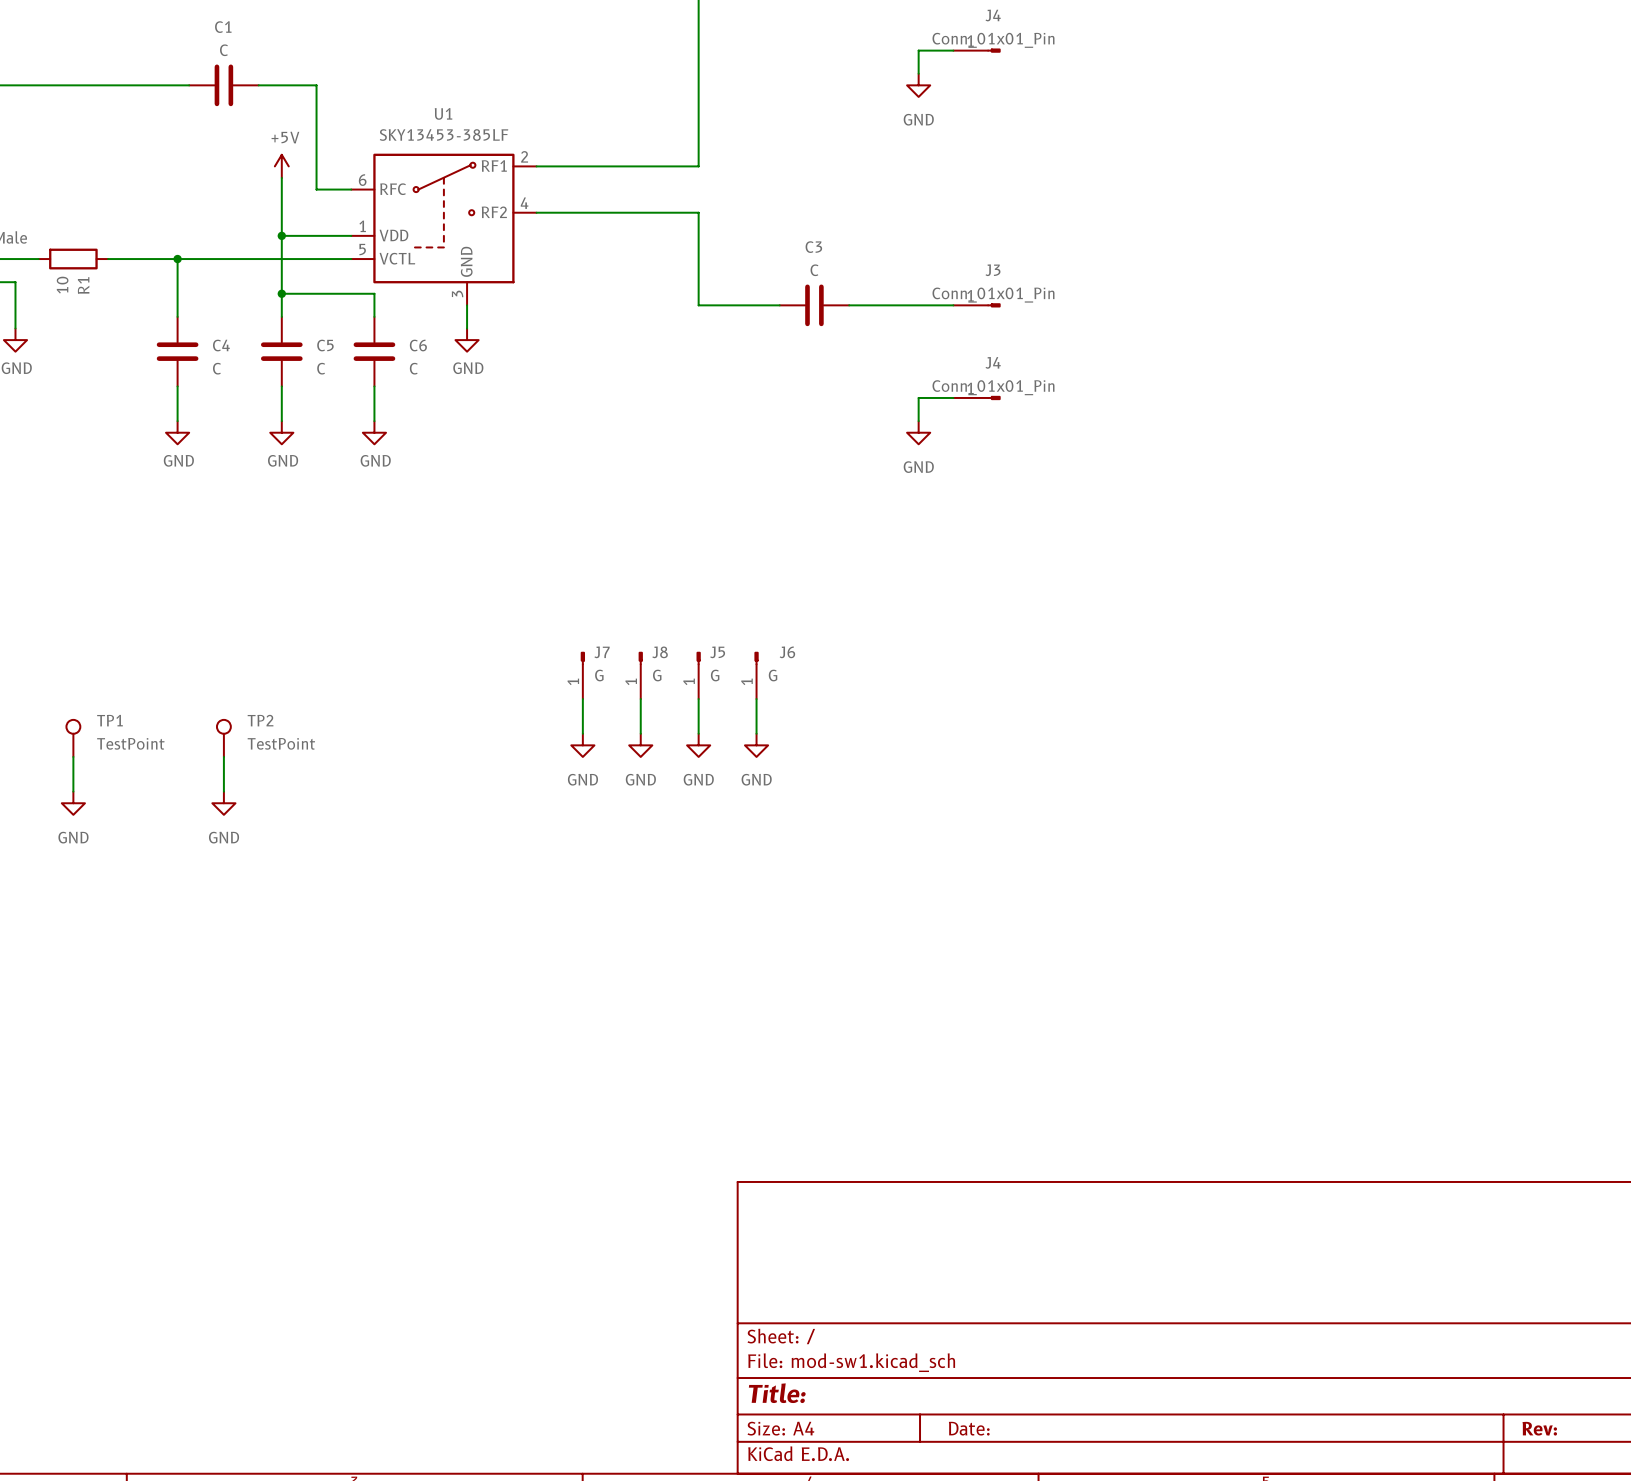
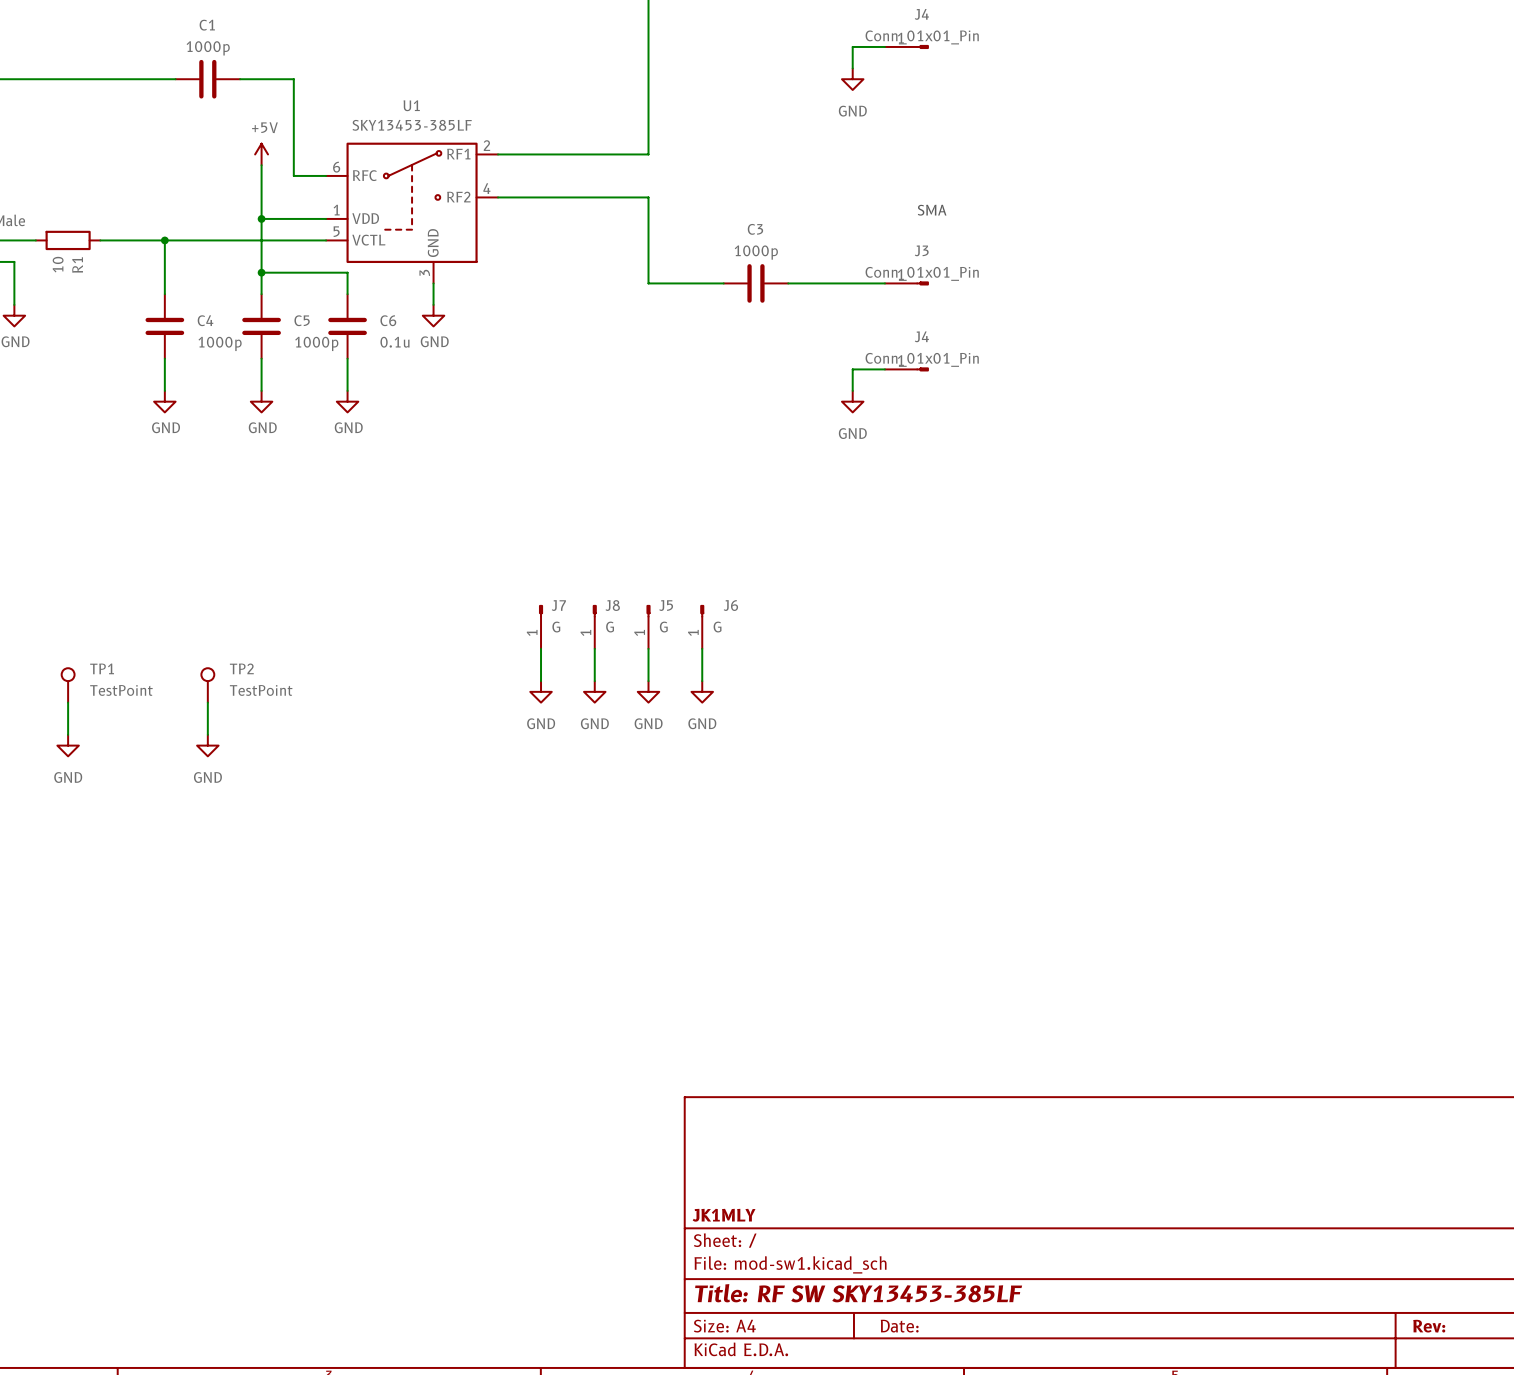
C1 value: C (223, 50) -> 1000p (208, 48)
text: none -> SMA (932, 210)
C3 value: C (814, 270) -> 1000p (756, 252)
C4 value: C (216, 368) -> 1000p (220, 343)
C5 value: C (321, 368) -> 1000p (316, 343)
C6 value: C (413, 368) -> 0.1u (394, 342)
title block: none -> JK1MLY (724, 1215)
title block: Title: (777, 1393) -> Title: RF SW SKY13453-385LF (858, 1293)

